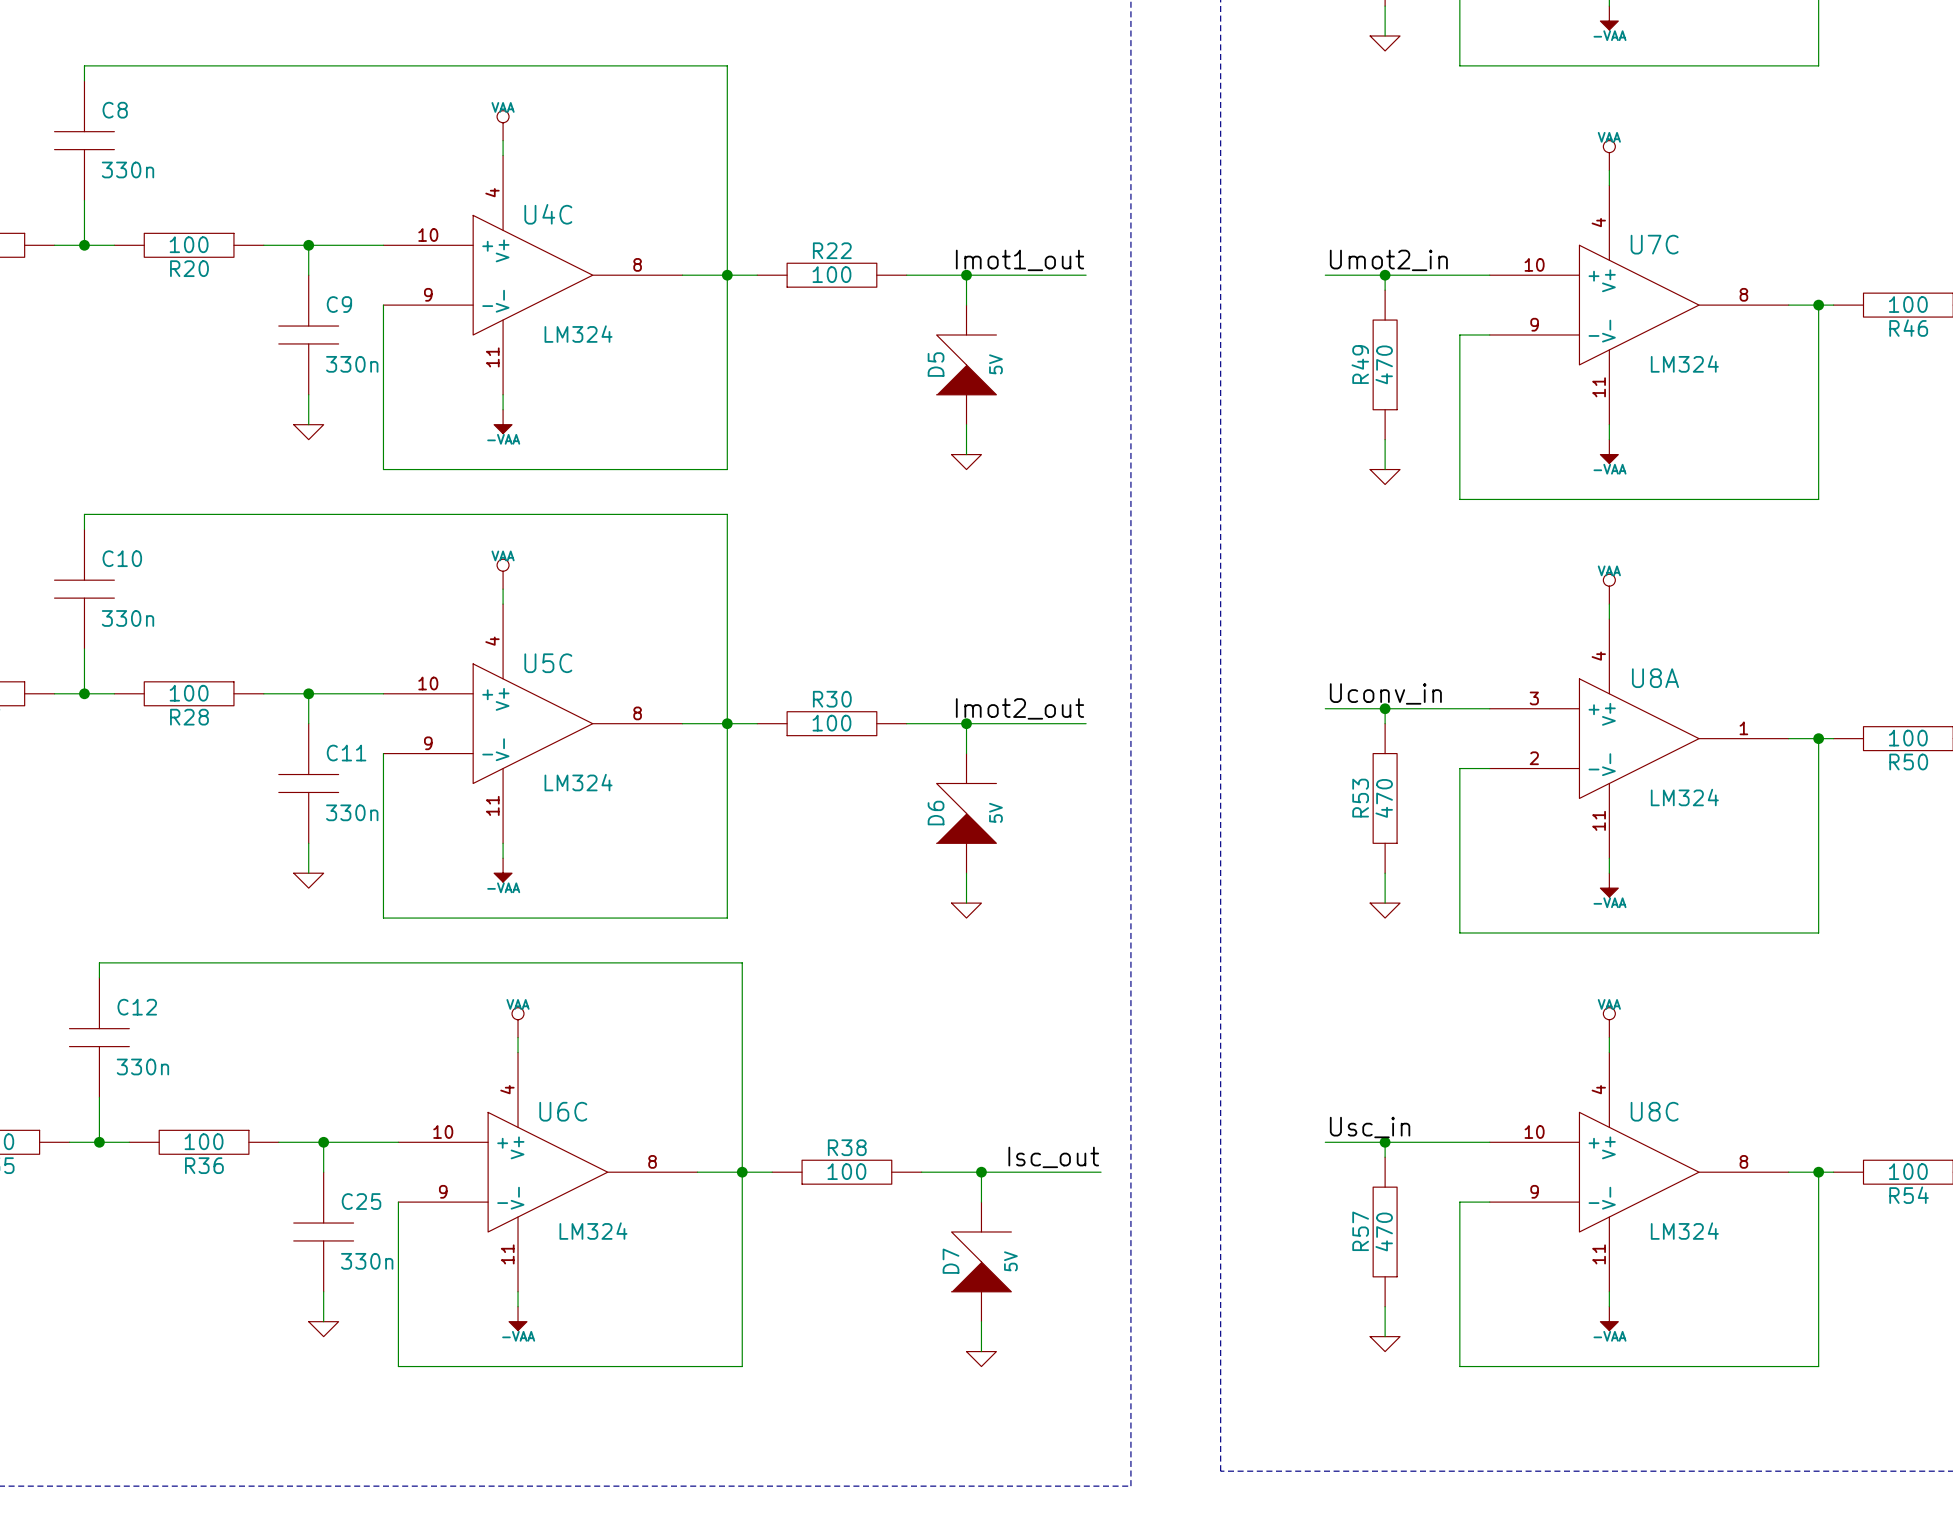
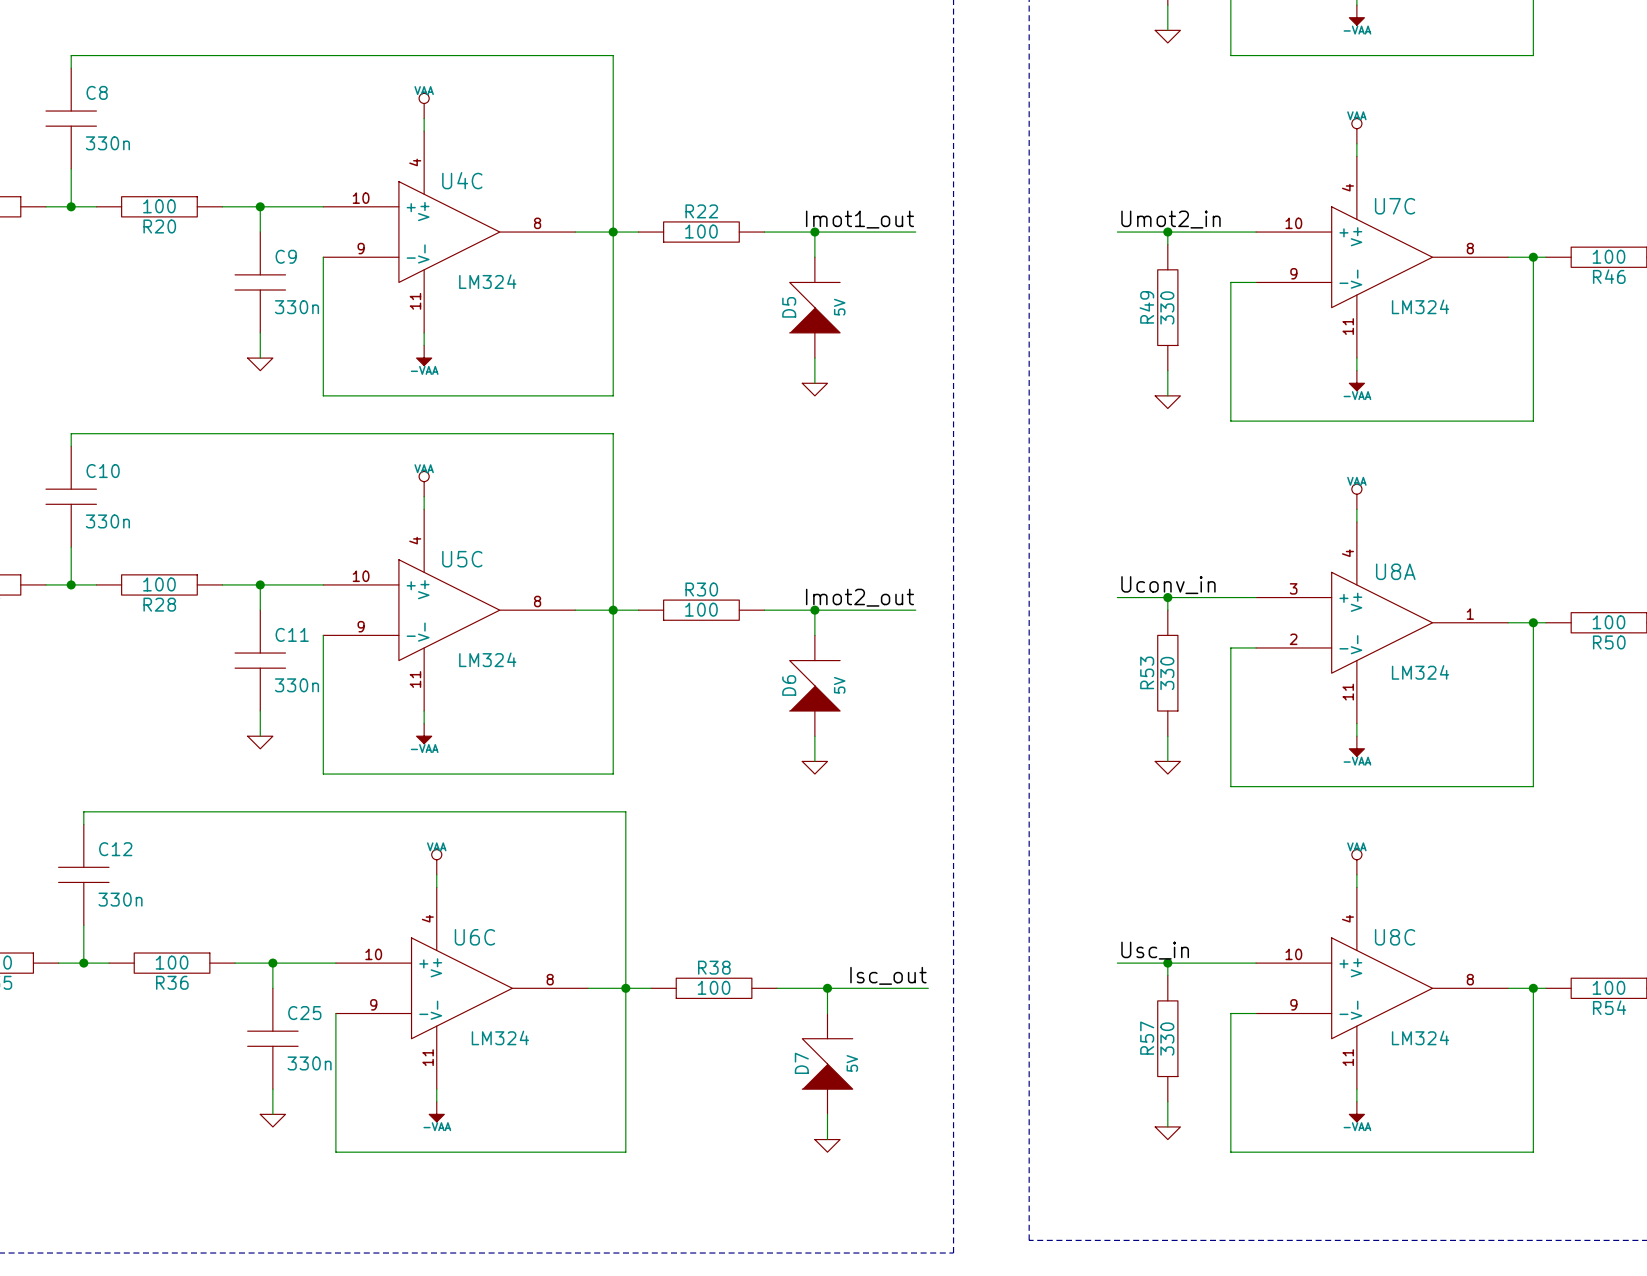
R49 value: 470 (1384, 364) -> 330 (1167, 307)
R53 value: 470 (1384, 798) -> 330 (1167, 673)
R57 value: 470 (1384, 1231) -> 330 (1167, 1039)

